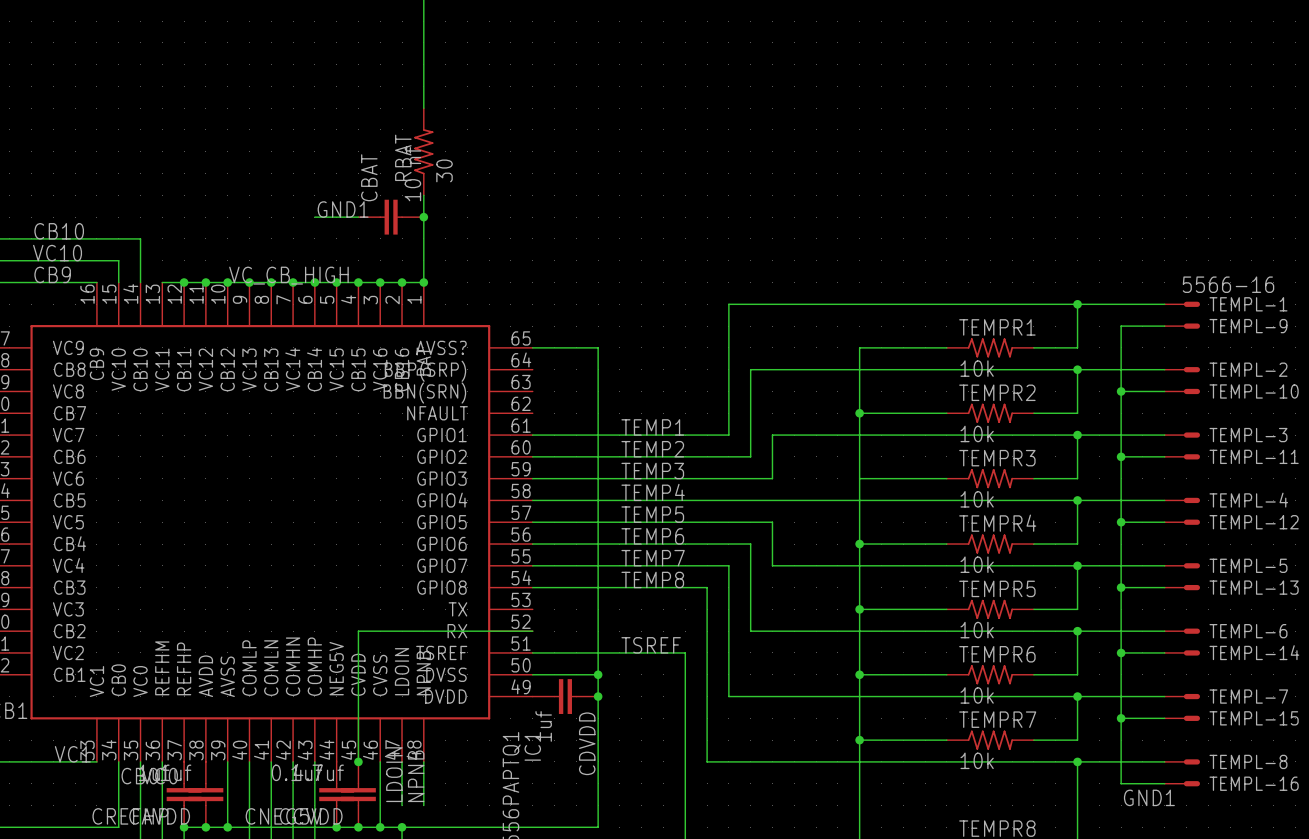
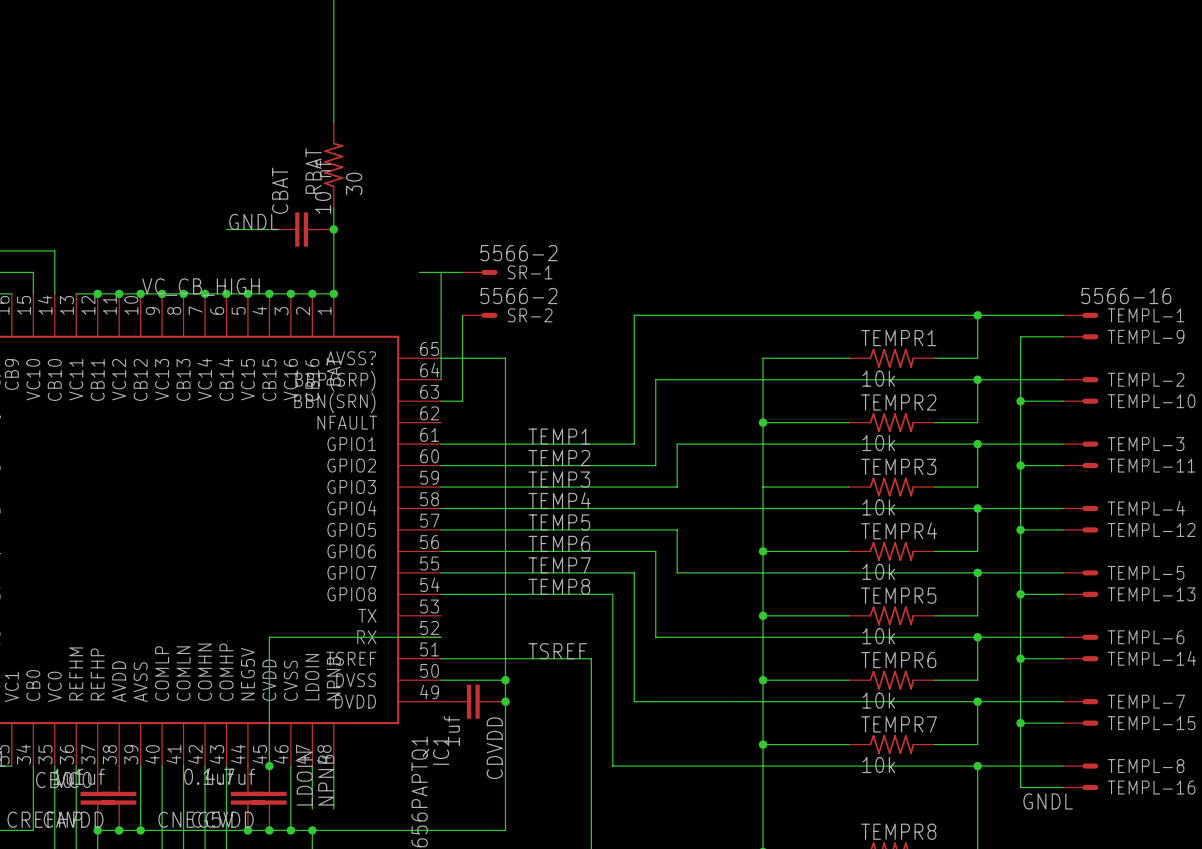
label: GND1 (343, 209) -> GNDL (253, 221)
wire: none -> (419, 272) (462, 272)
wire: none -> (441, 272) (441, 379)
SR-1: none -> 5566-2 (479, 272)
wire: none -> (462, 315) (462, 401) (441, 401)
SR-2: none -> 5566-2 (479, 315)
label: GND1 (1149, 797) -> GNDL (1048, 801)

